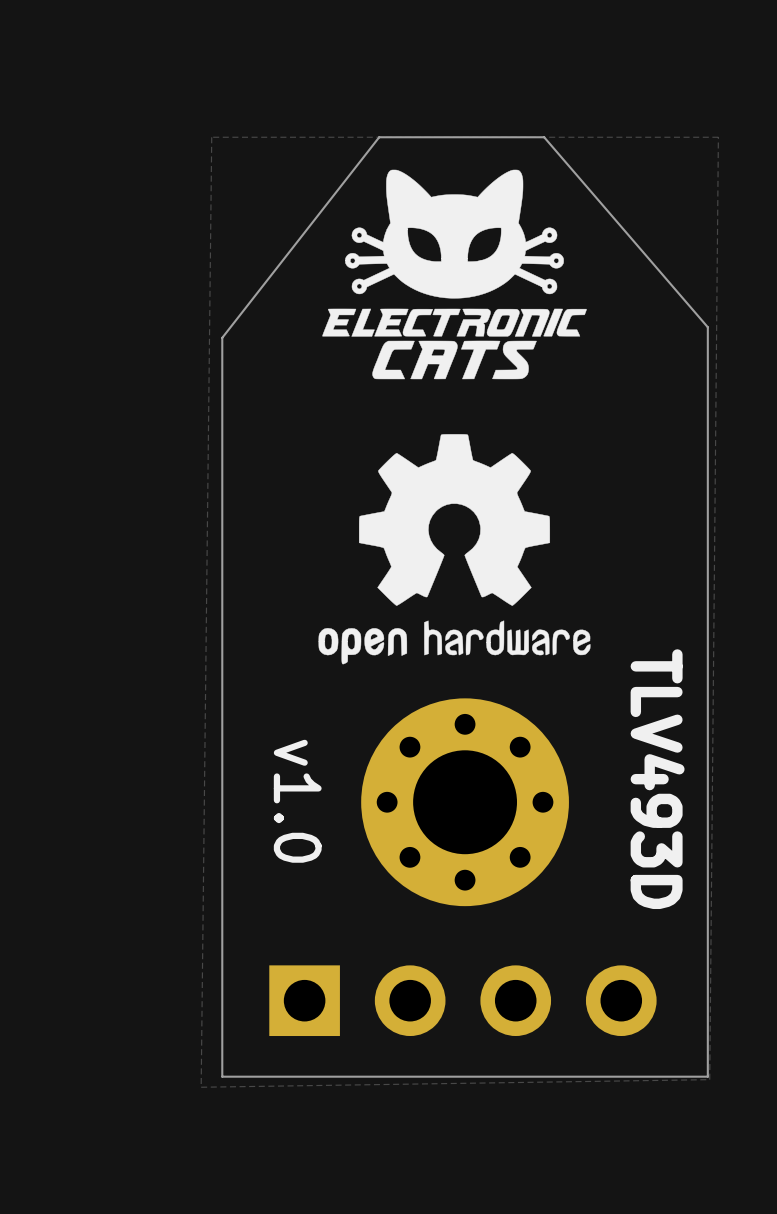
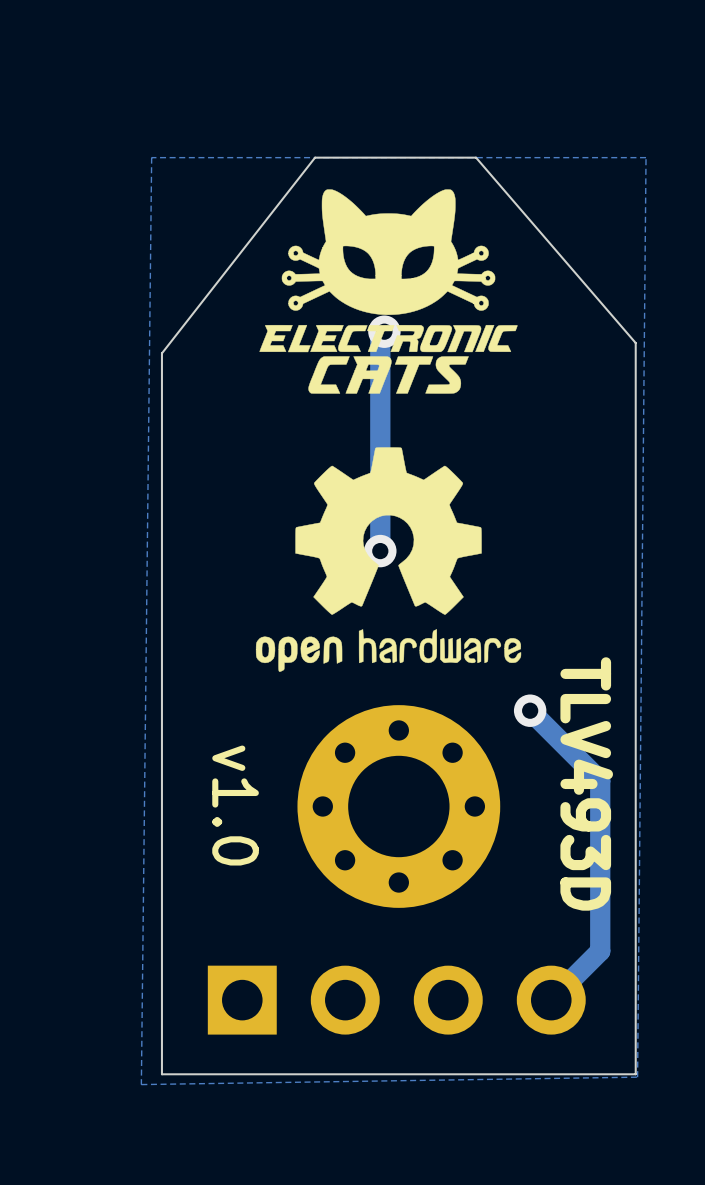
track: none -> (384, 331) (380, 335) (380, 551)
via: none -> (384, 331)
via: none -> (380, 551)
track: none -> (530, 710) (600, 780) (600, 951) (551, 1000)
via: none -> (530, 710)

